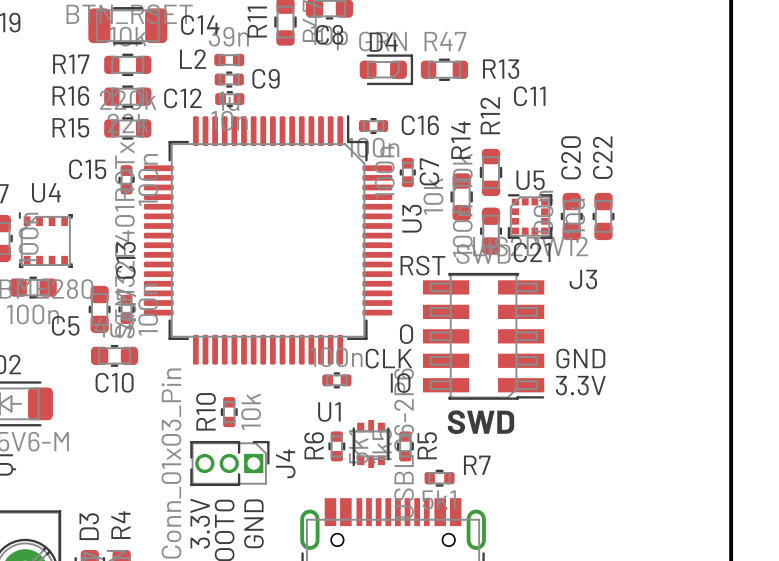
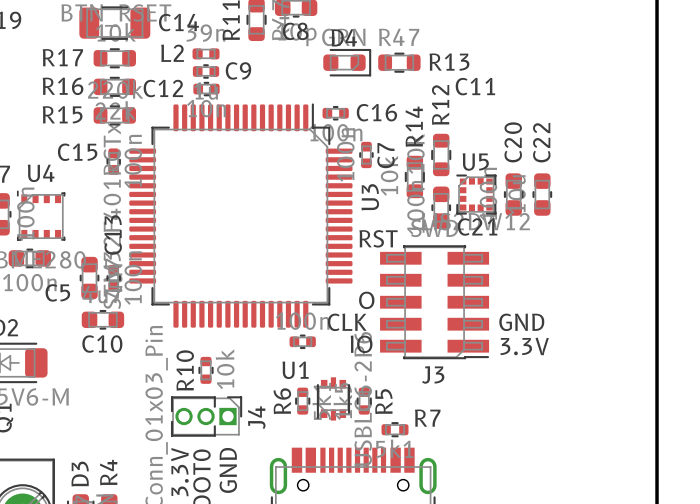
J3 name position: J3 (583, 279) -> J3 (433, 374)
text: SWD (481, 422) -> none

